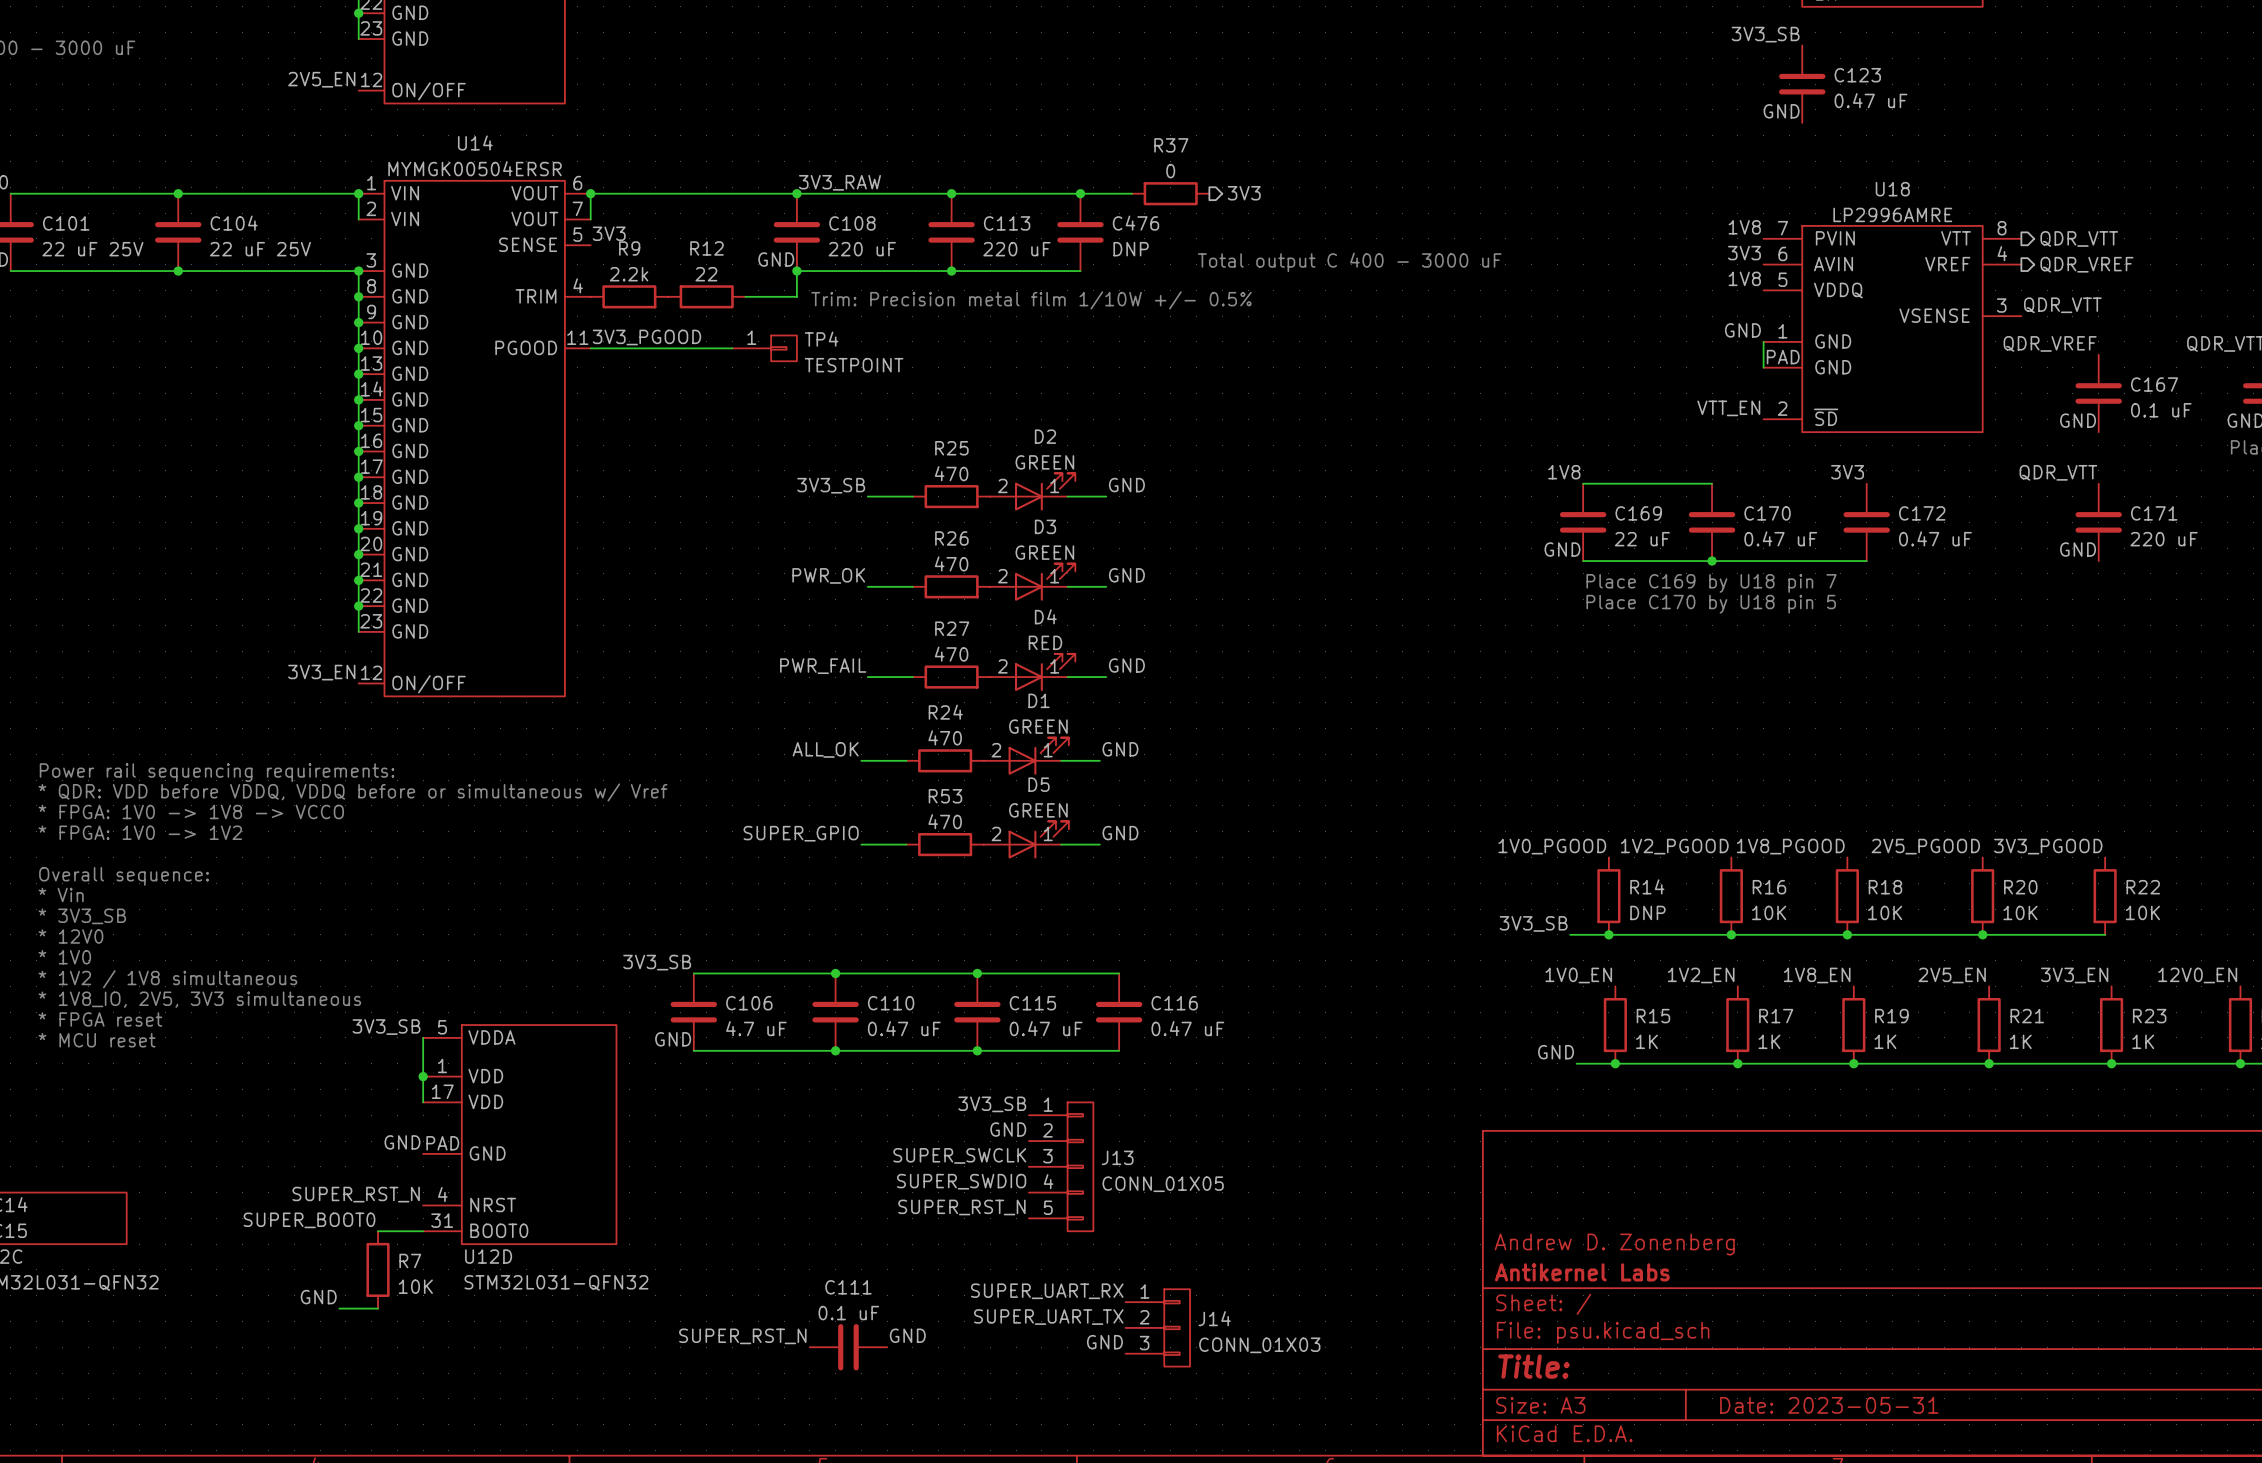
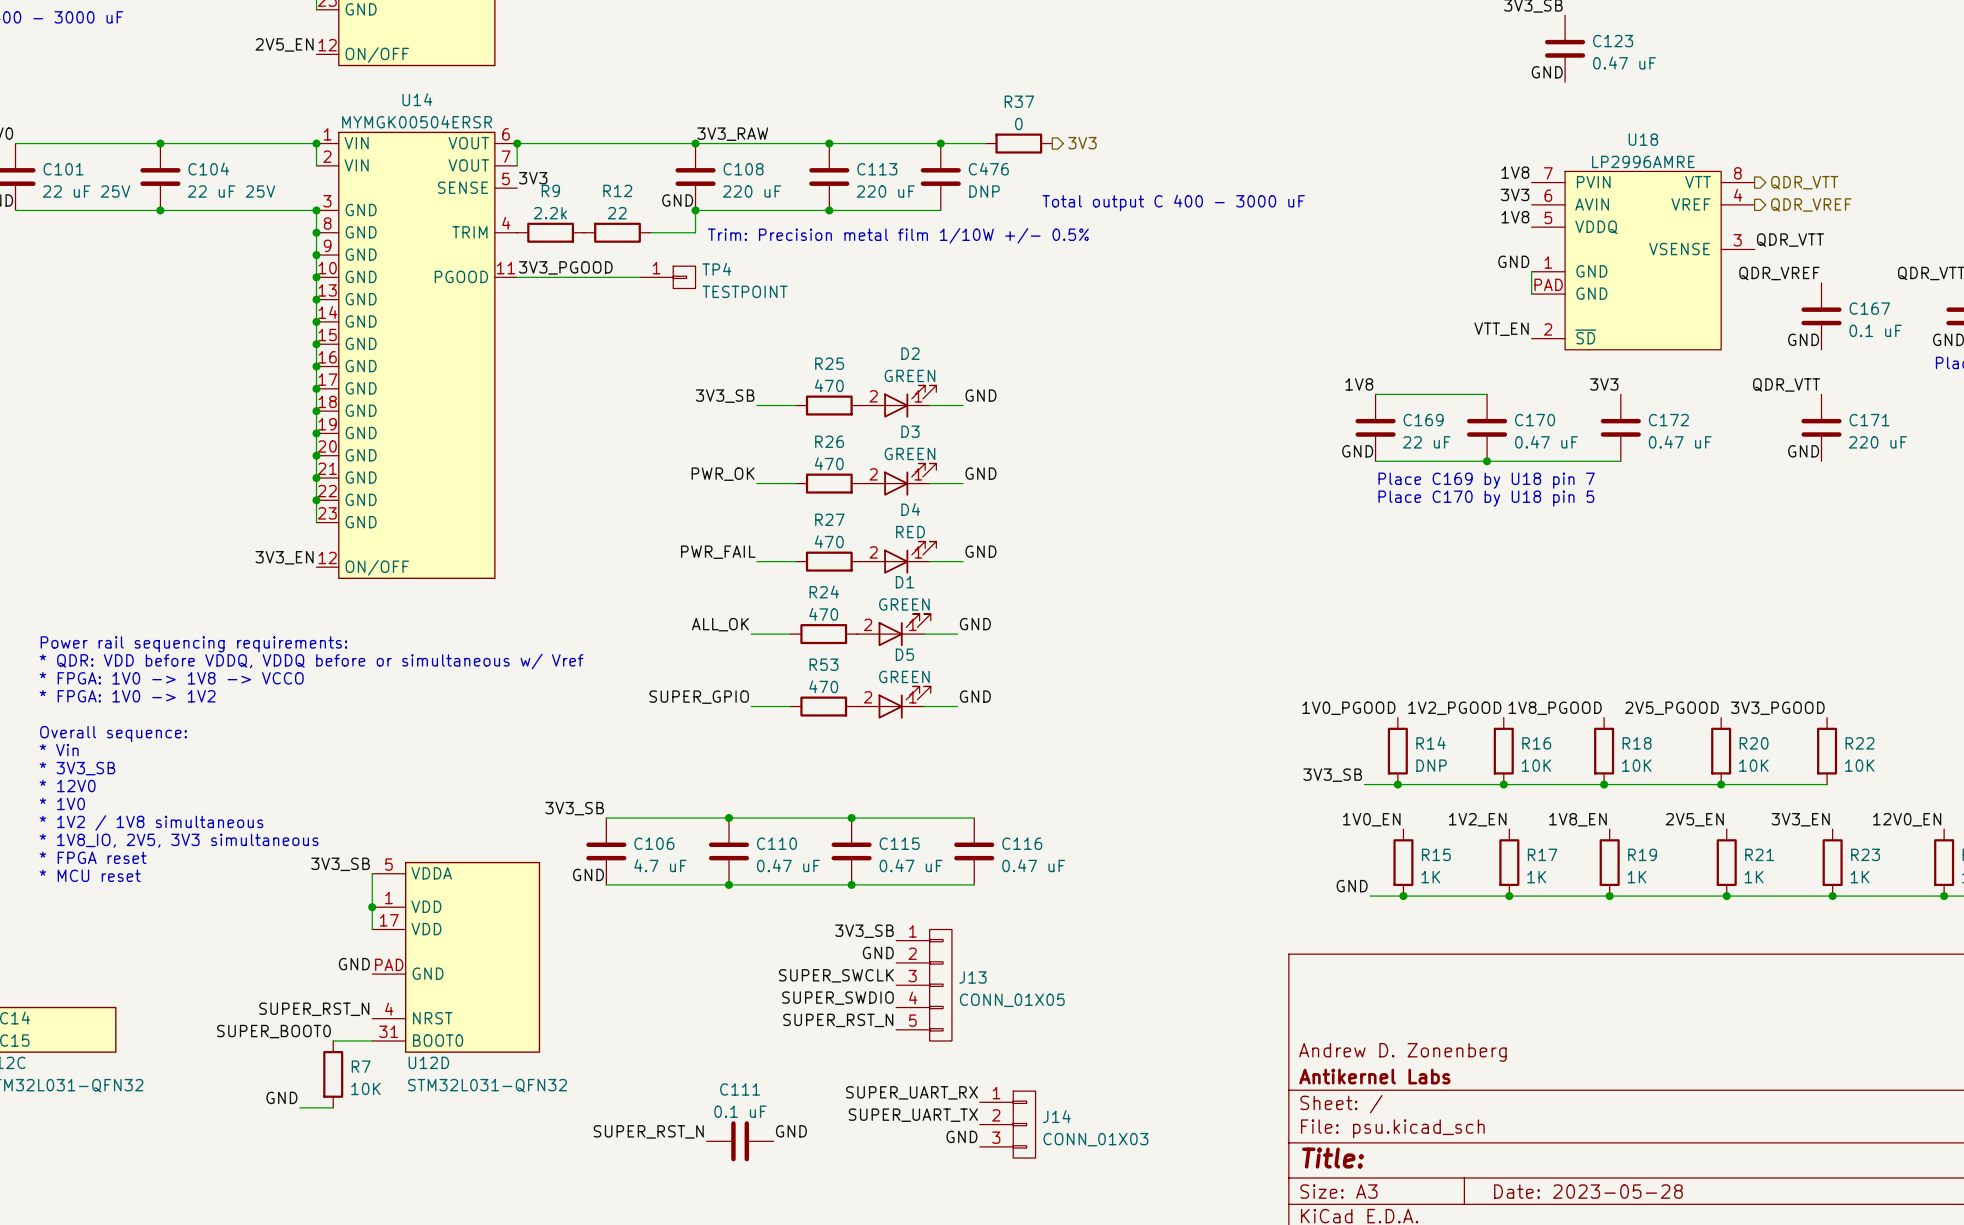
title block: Date: 2023-05-31 (1829, 1405) -> Date: 2023-05-28 (1588, 1191)

